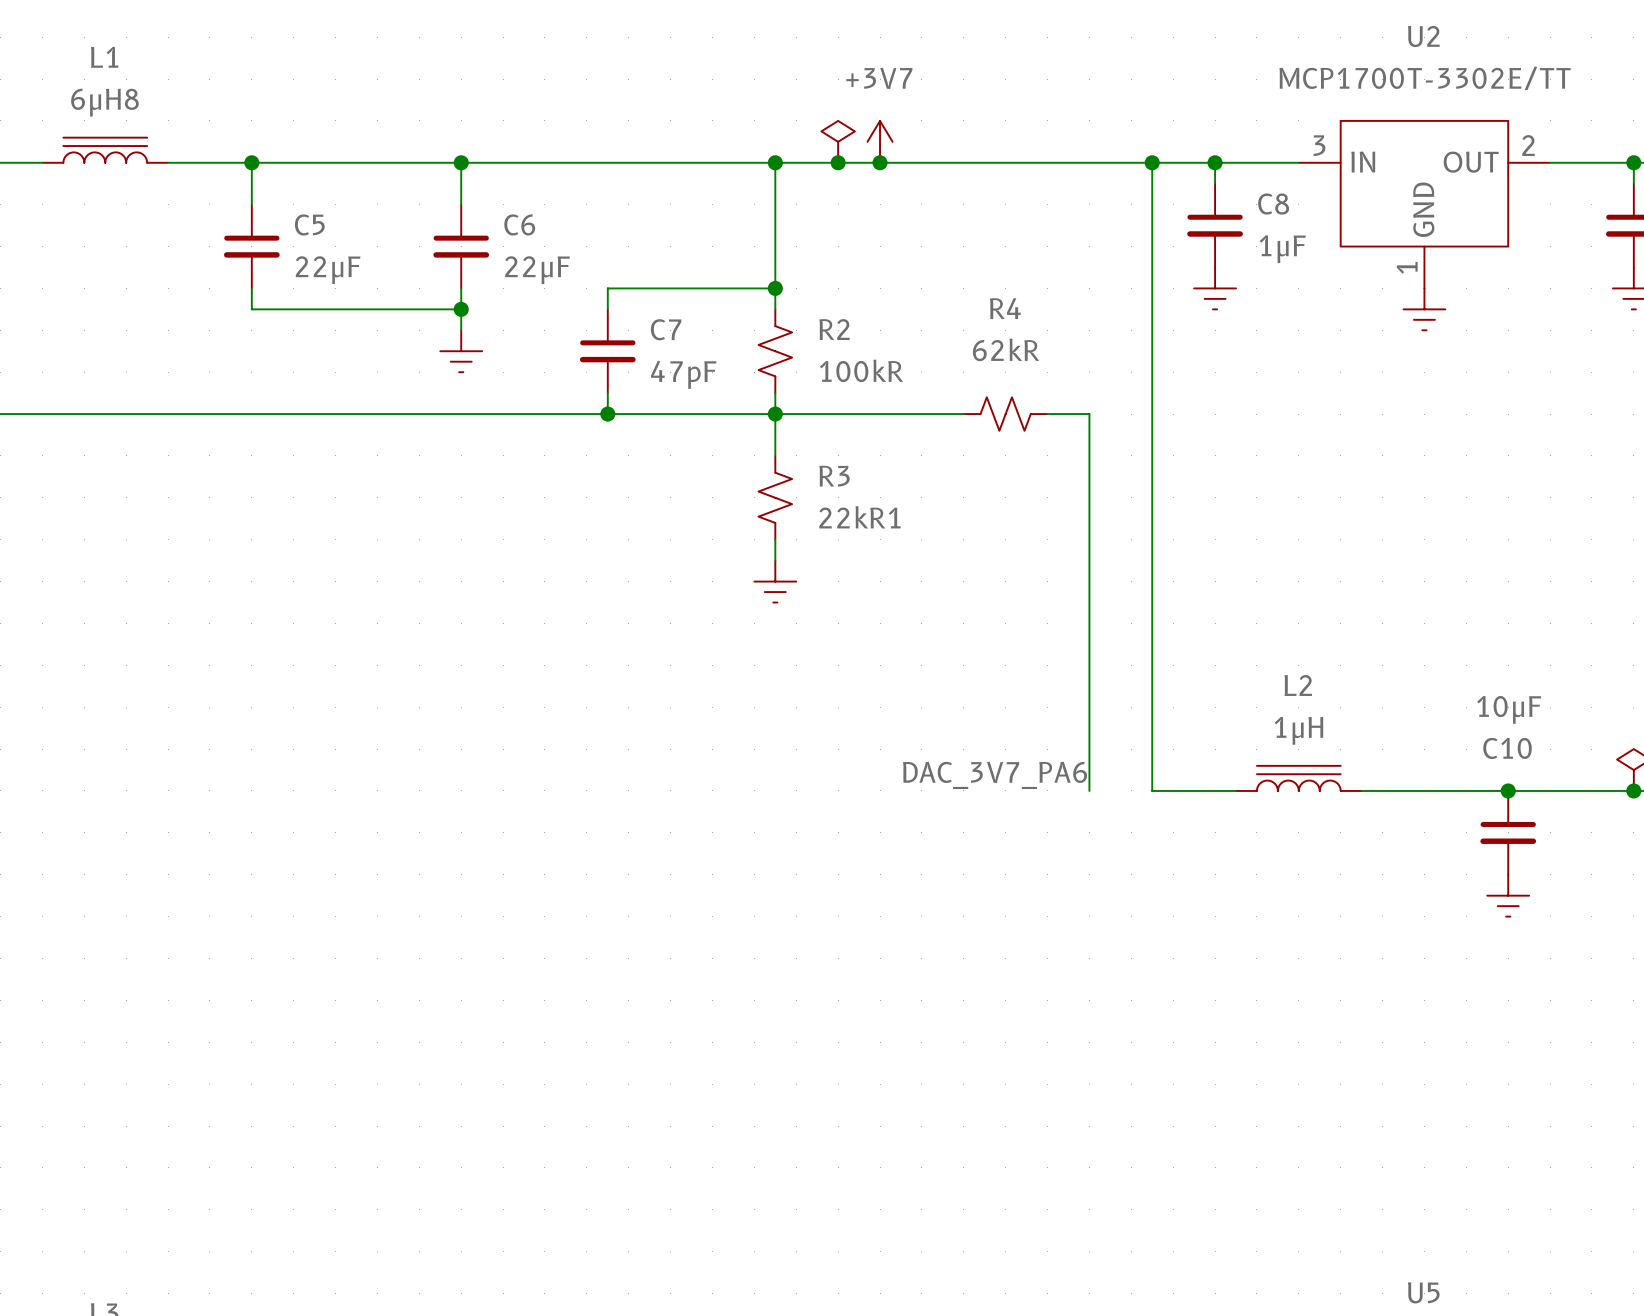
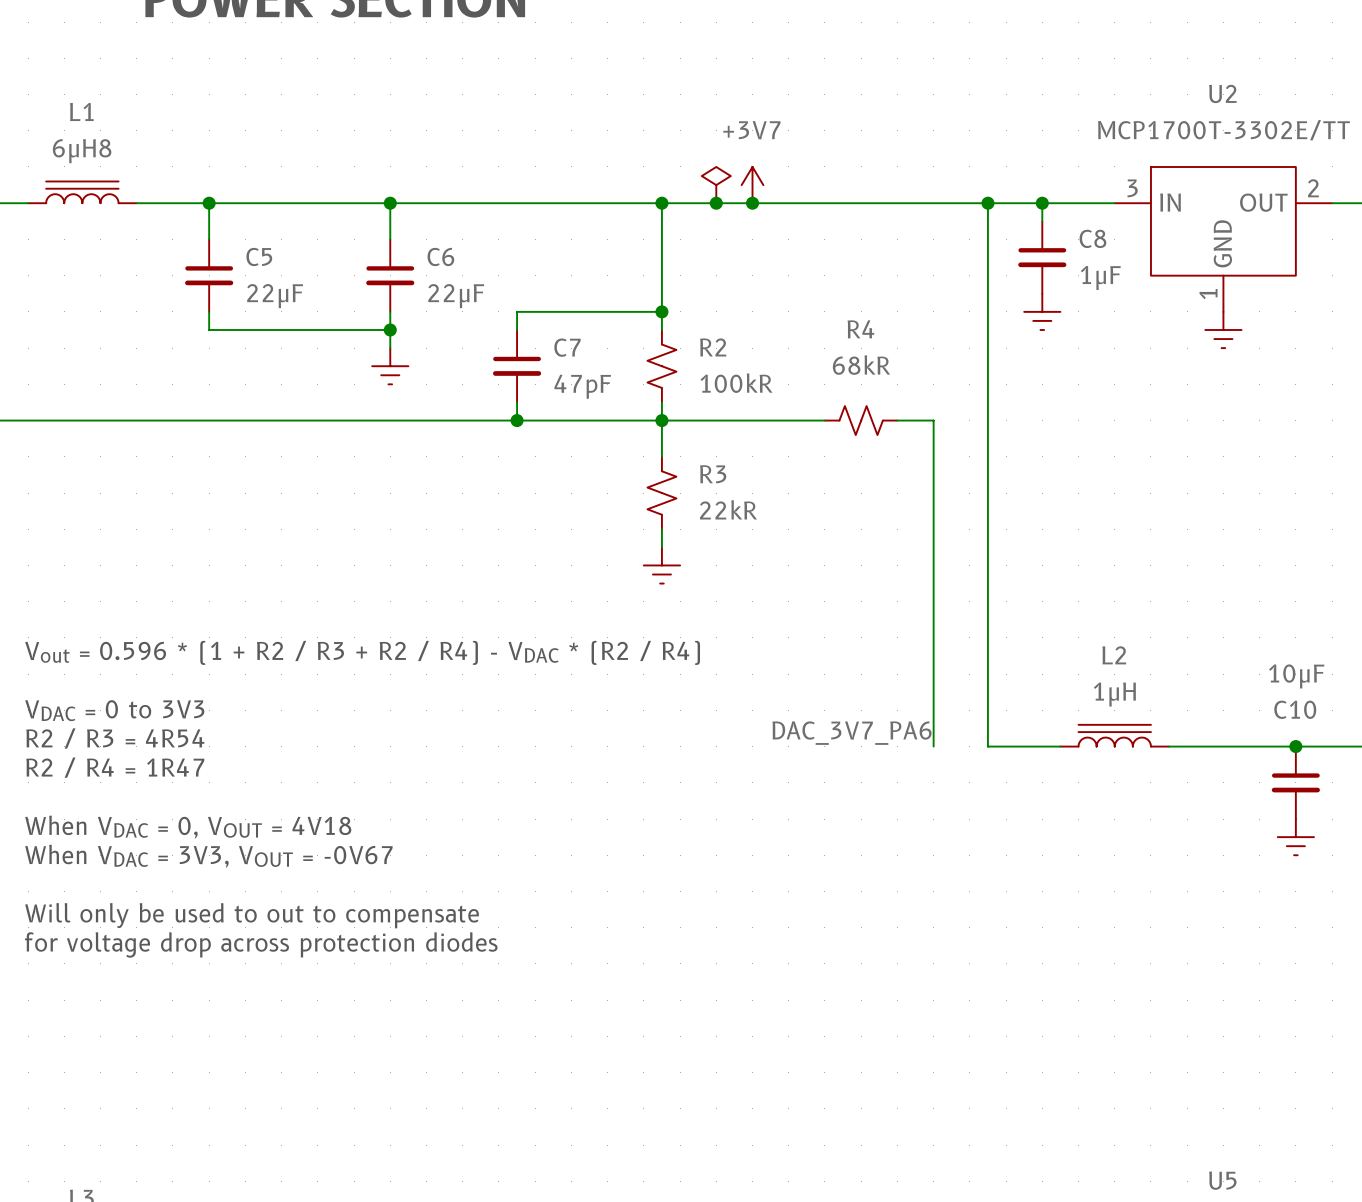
R4 value: 62kR (1006, 349) -> 68kR (861, 365)
R3 value: 22kR1 (859, 517) -> 22kR (728, 509)
text: none -> Vout = 0.596 * (1 + R2 / R3 + R2 / R4) - VDAC * (R2 / R4) (362, 652)
text: none -> VDAC = 0 to 3V3 (114, 710)
text: none -> R2 / R3 = 4R54 (115, 738)
text: none -> R2 / R4 = 1R47 (115, 767)
text: none -> When VDAC = 0, VOUT = 4V18 (188, 827)
text: none -> When VDAC = 3V3, VOUT = -0V67 (208, 856)
text: none -> Will only be used to out to compensate (252, 915)
text: none -> for voltage drop across protection diodes (261, 944)

